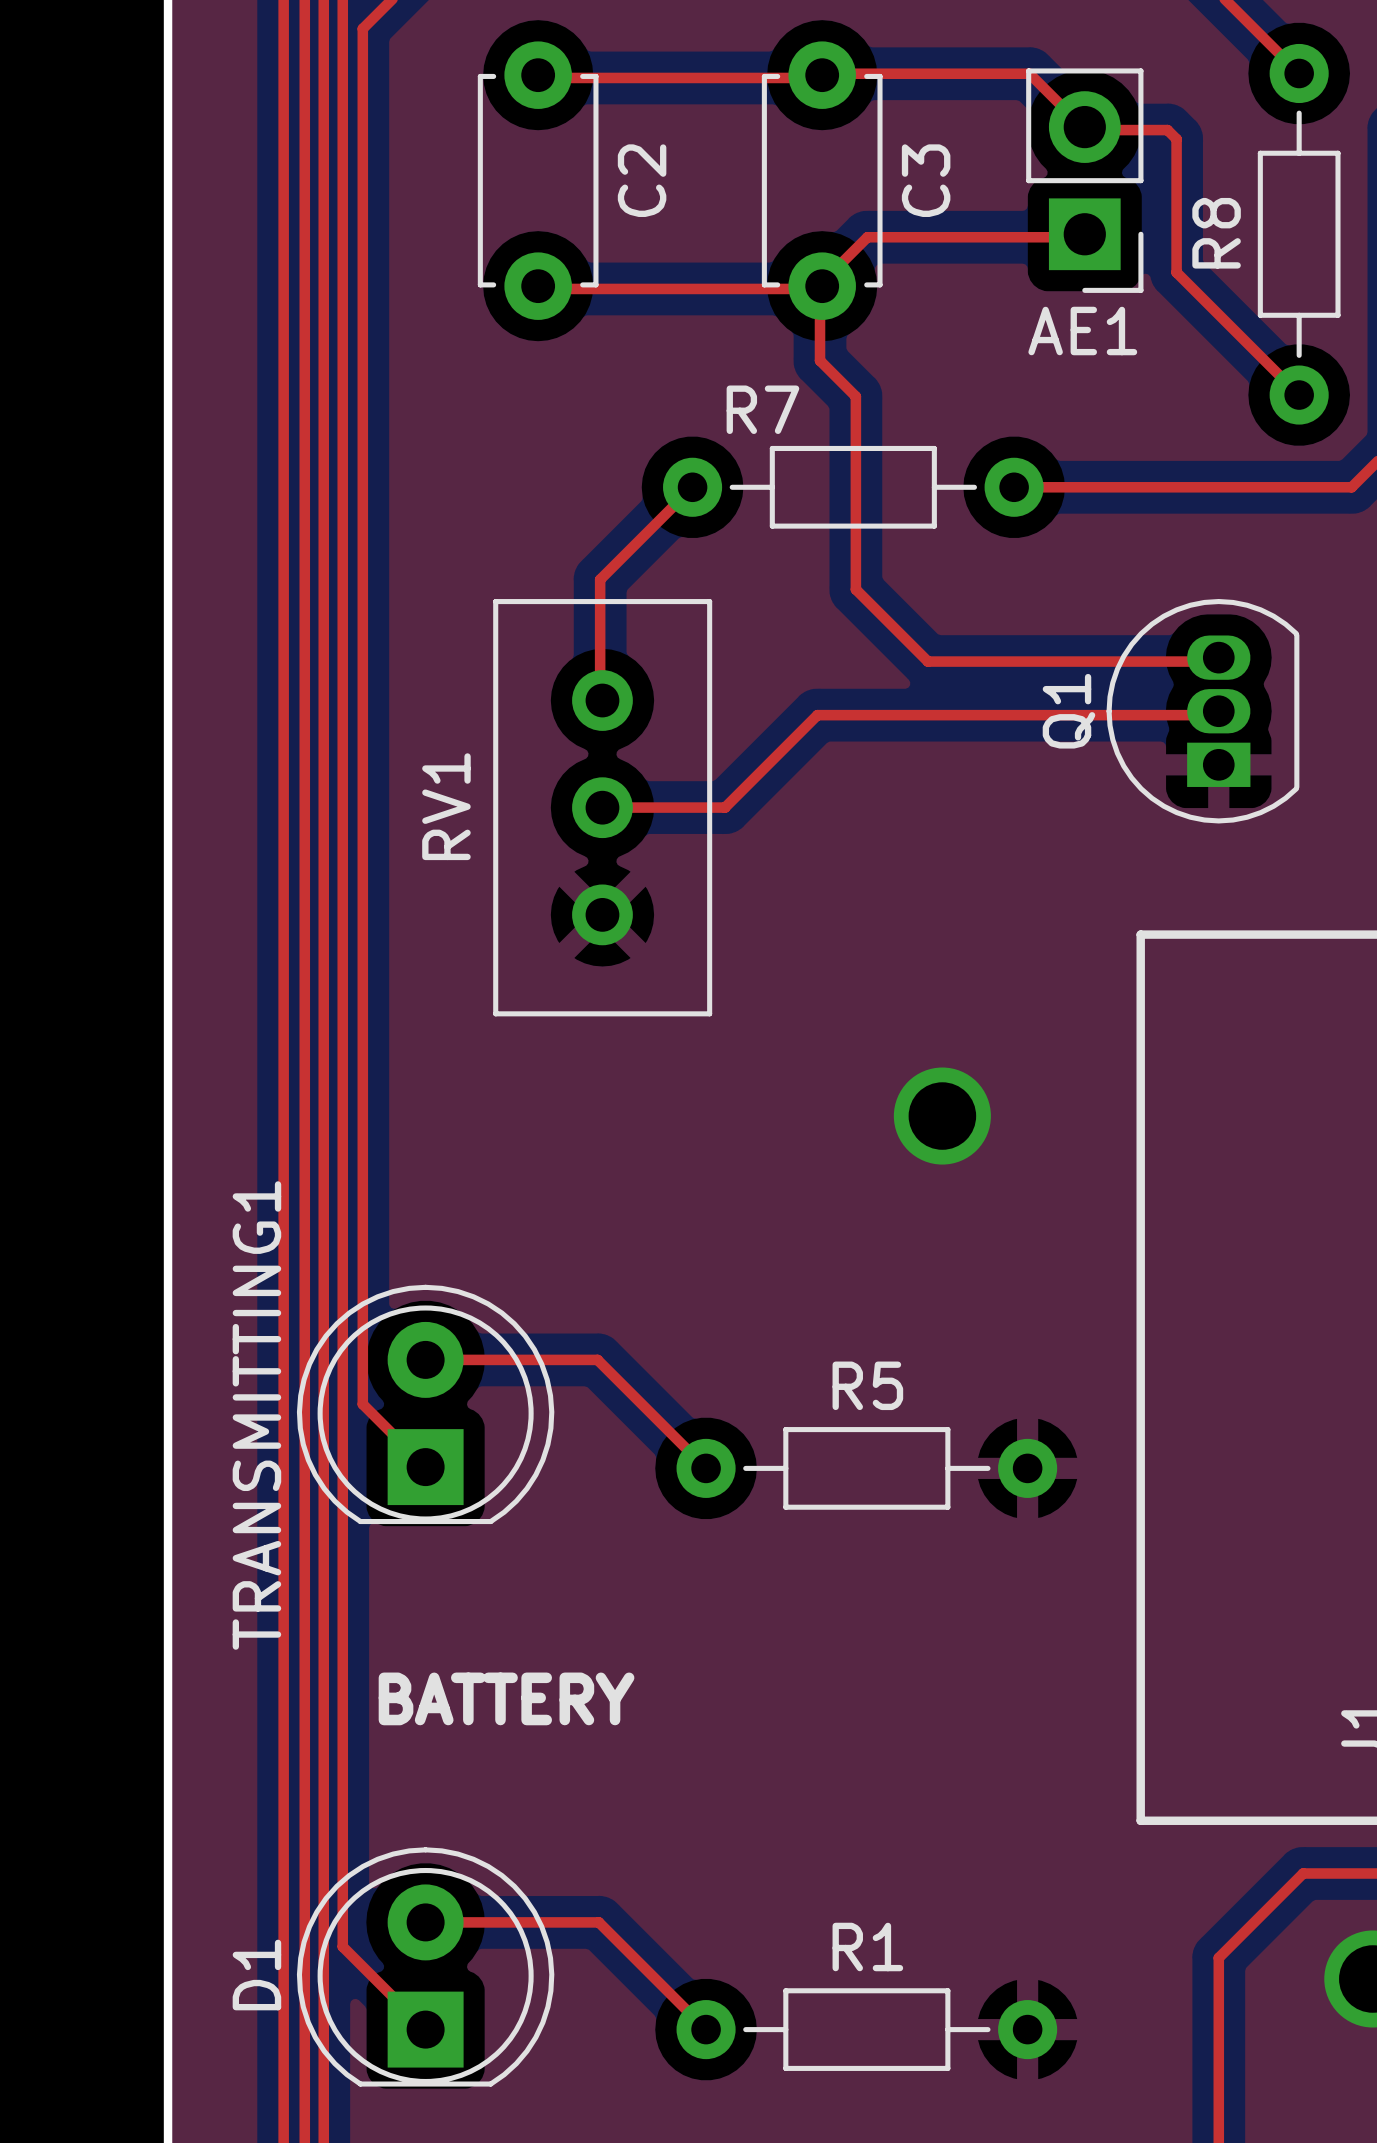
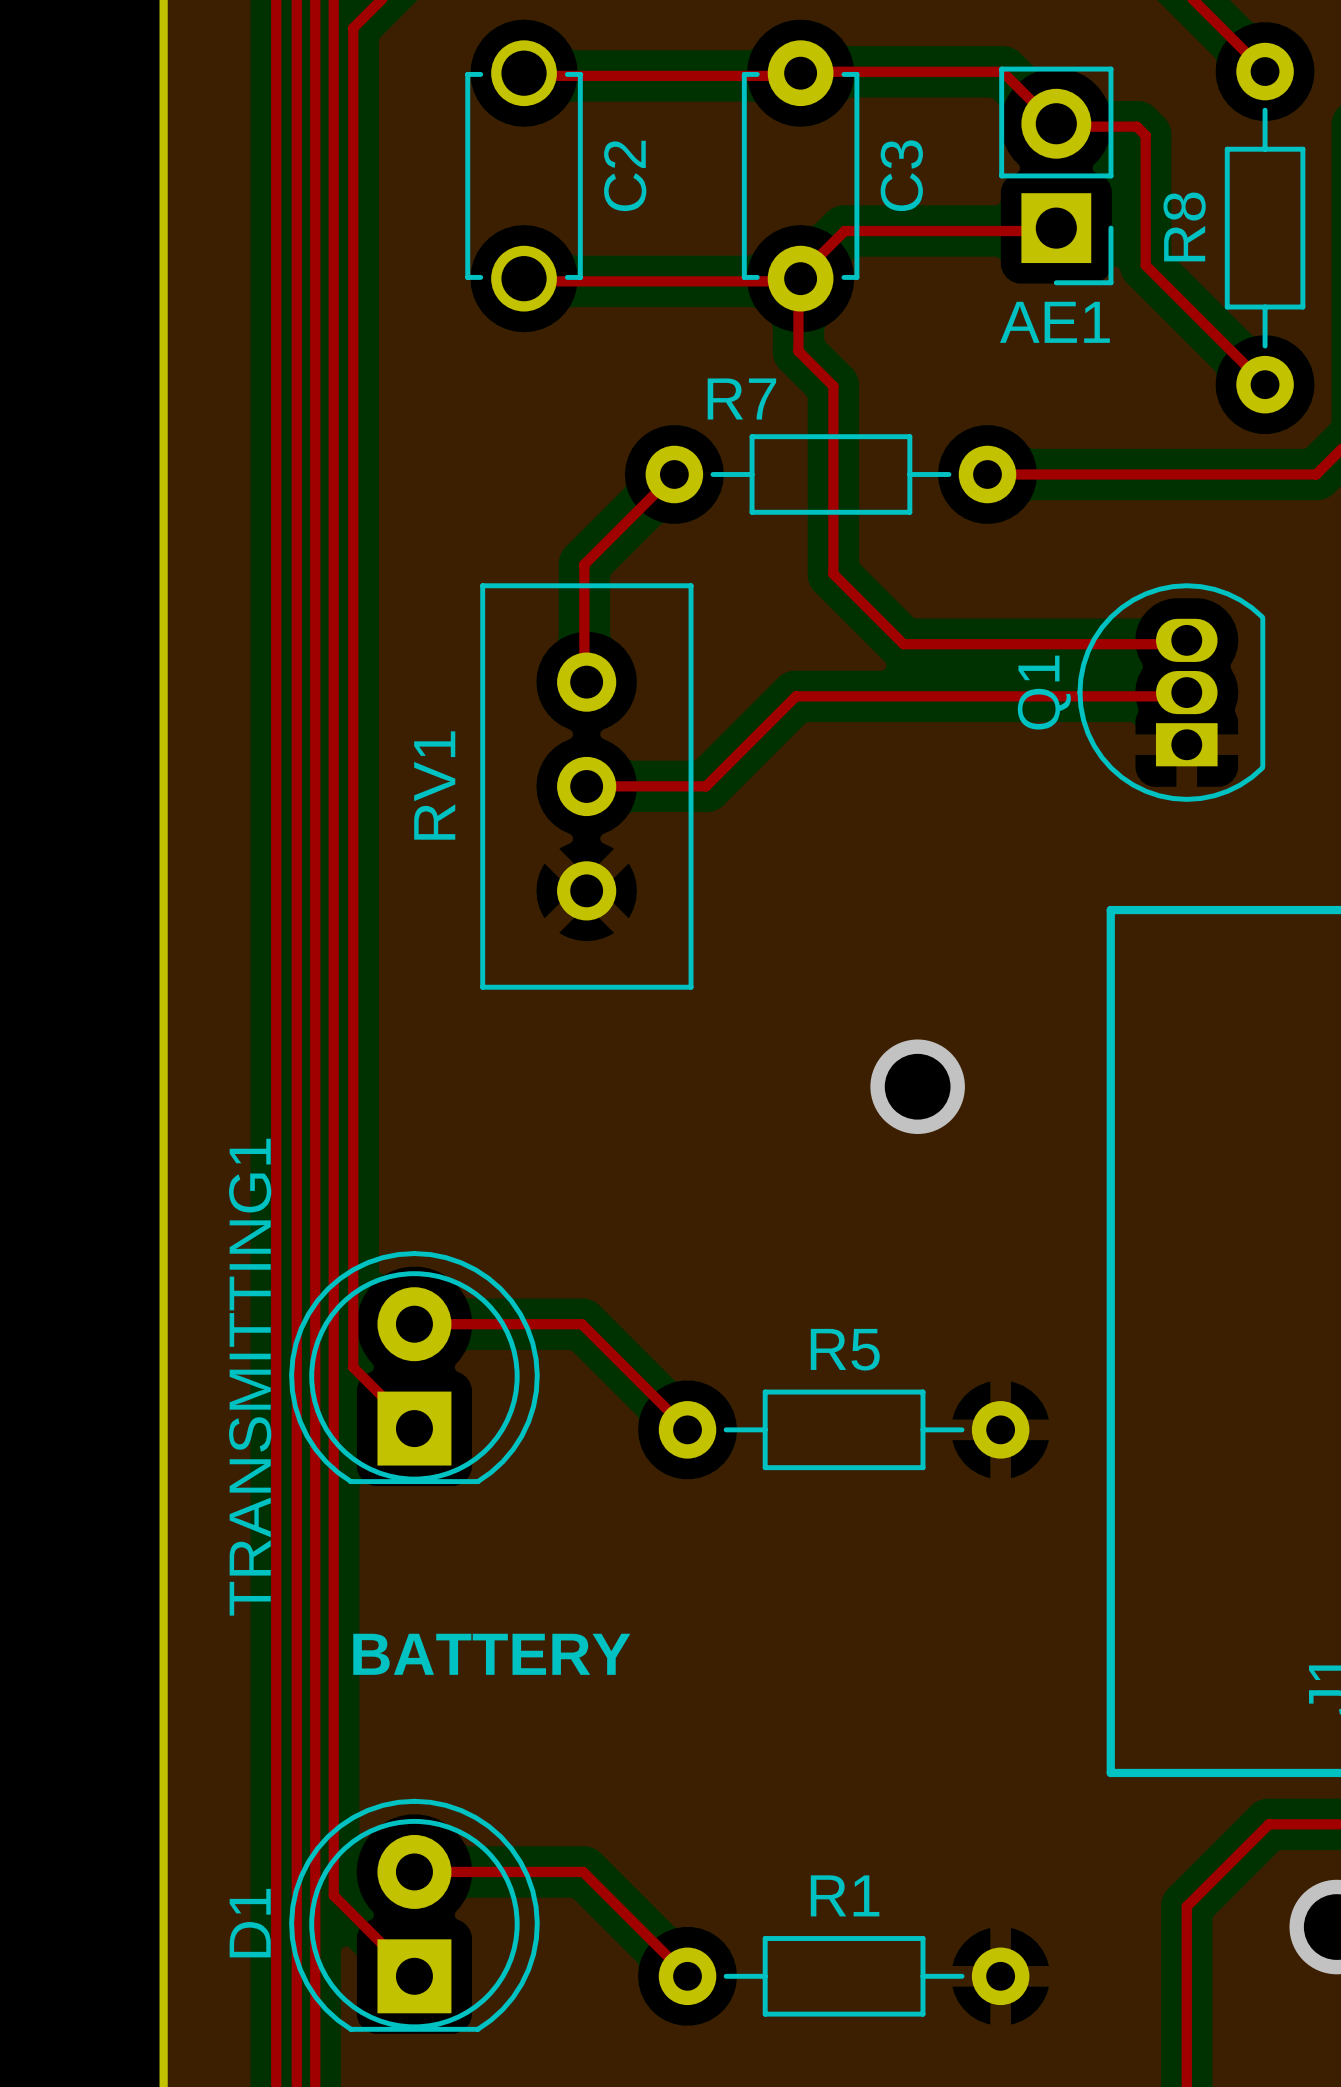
C2 footprint: [477, 41, 599, 320] -> [465, 40, 583, 312]

